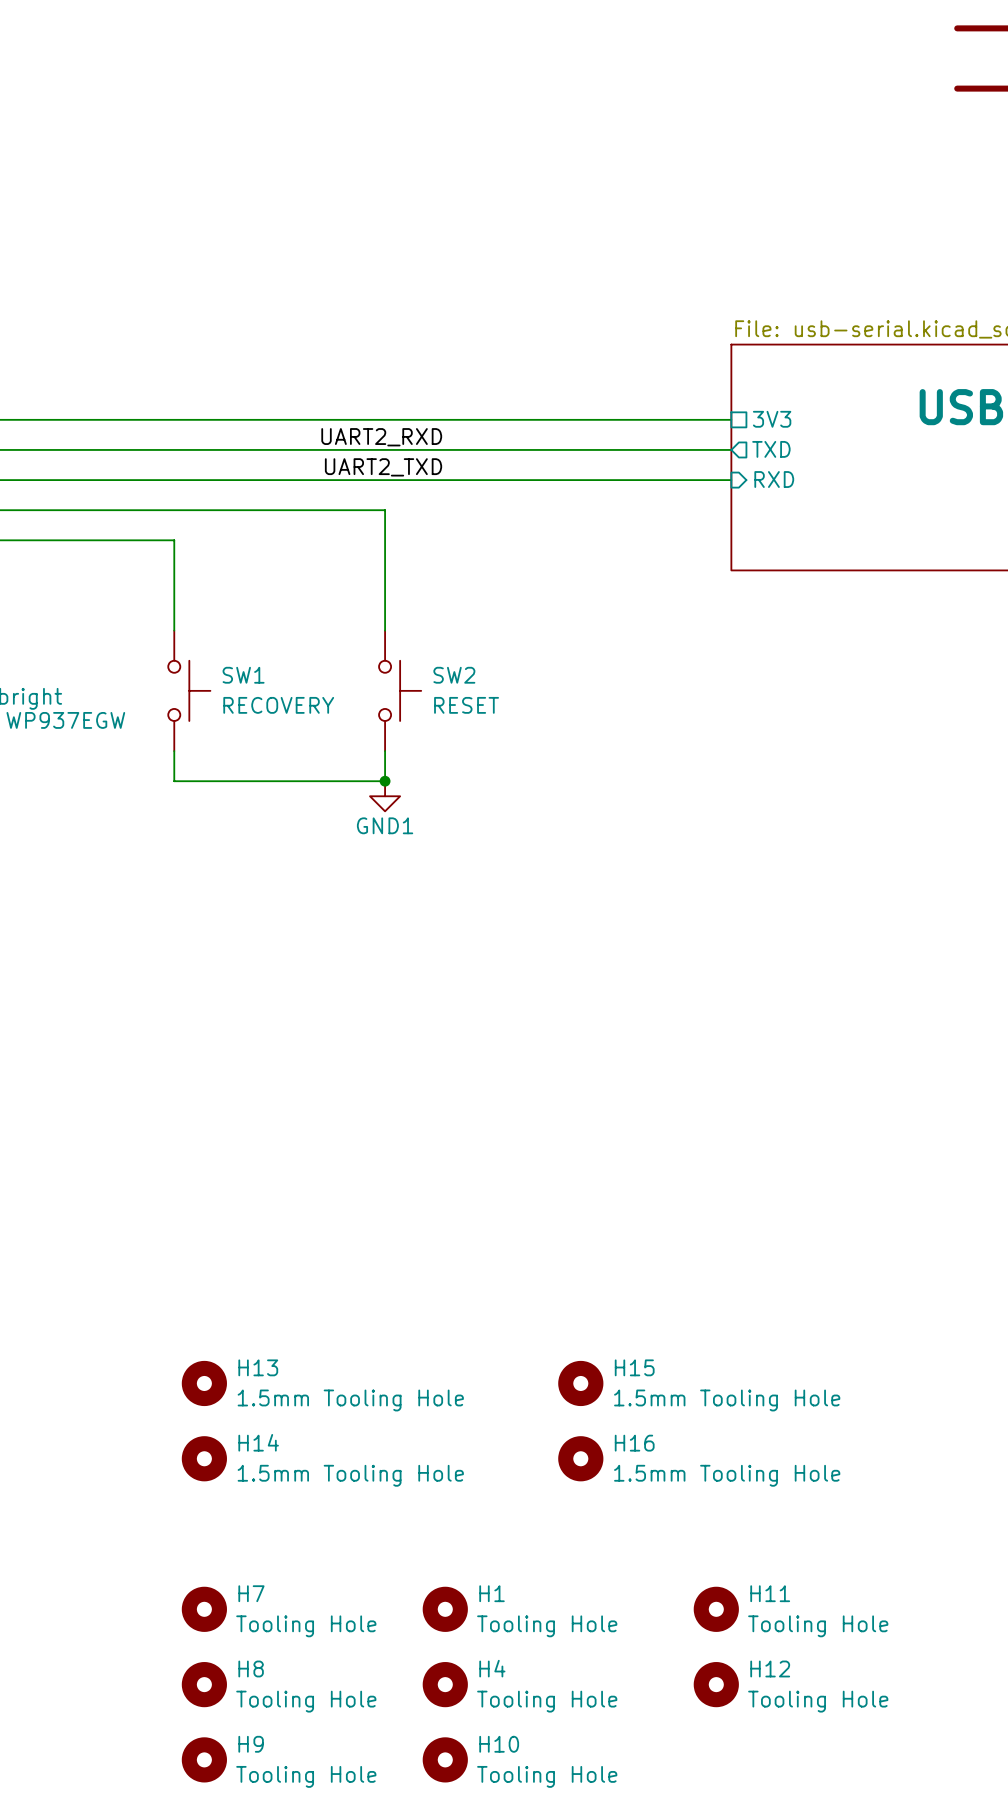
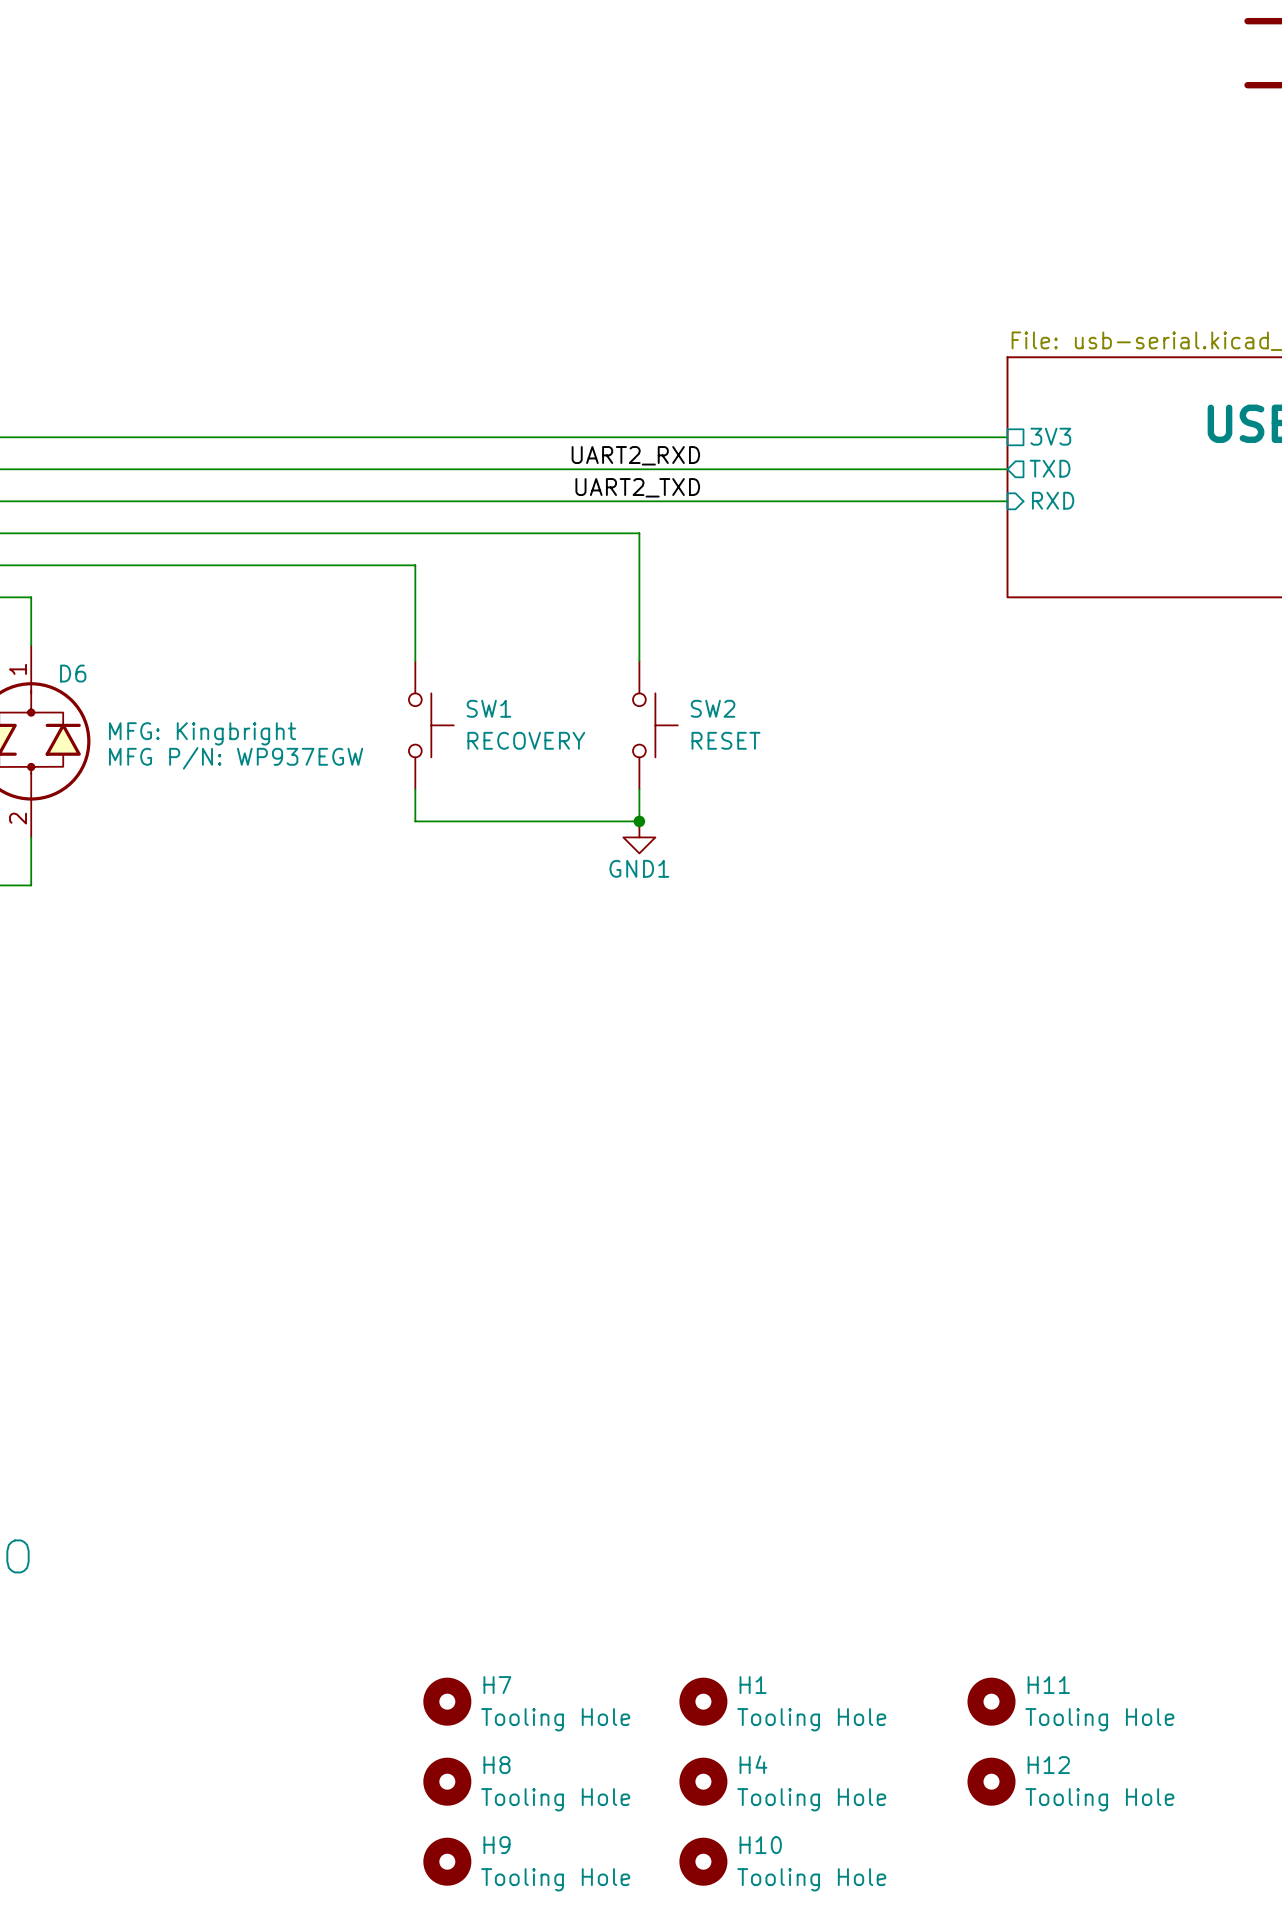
H13: 1.5mm Tooling Hole (204, 1383) -> none
H15: 1.5mm Tooling Hole (580, 1383) -> none
H14: 1.5mm Tooling Hole (204, 1458) -> none
H16: 1.5mm Tooling Hole (580, 1458) -> none

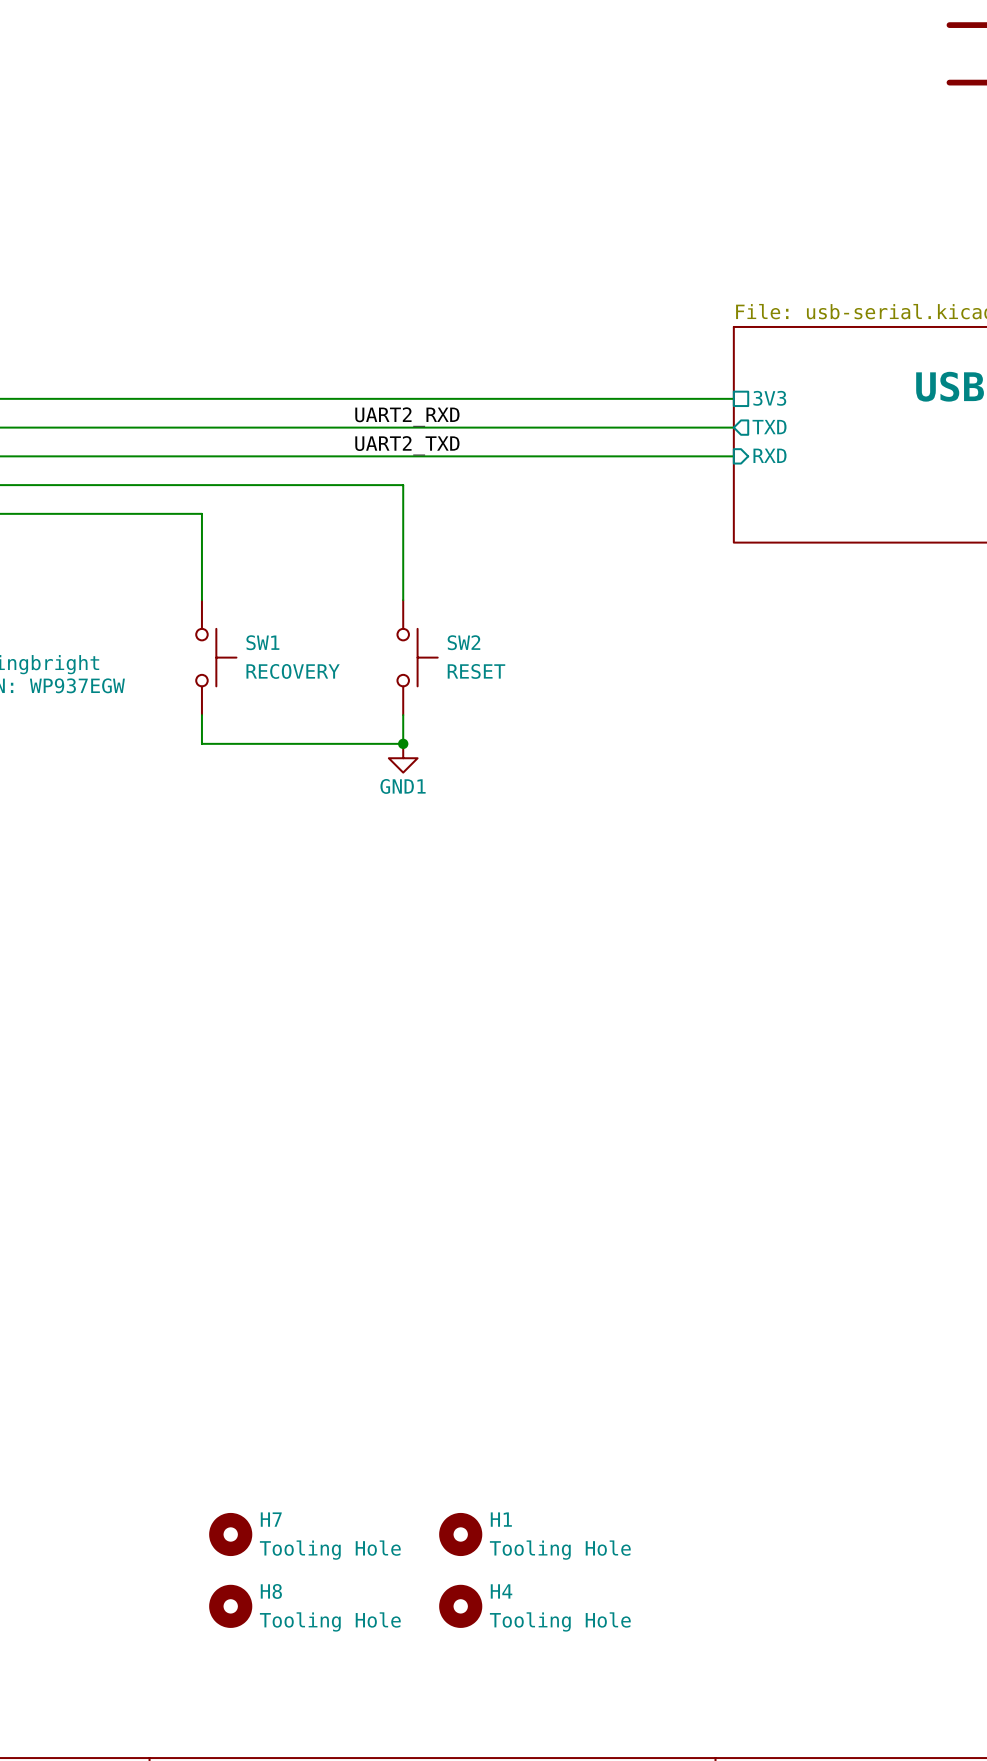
H11: Tooling Hole (991, 1701) -> none
H12: Tooling Hole (991, 1781) -> none
H9: Tooling Hole (447, 1861) -> none
H10: Tooling Hole (703, 1861) -> none

